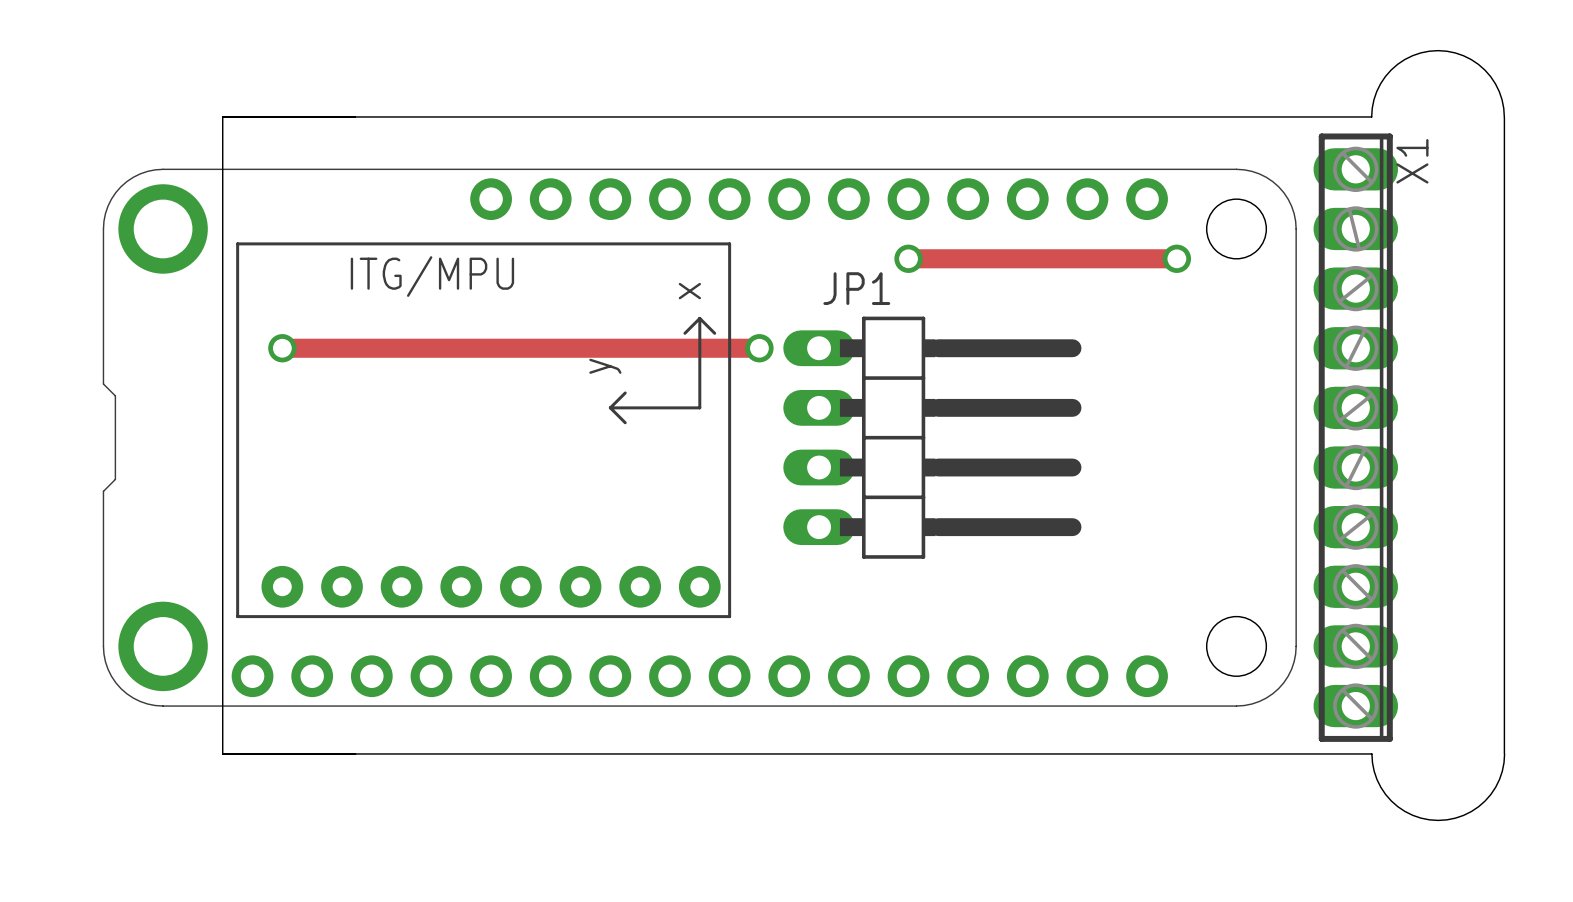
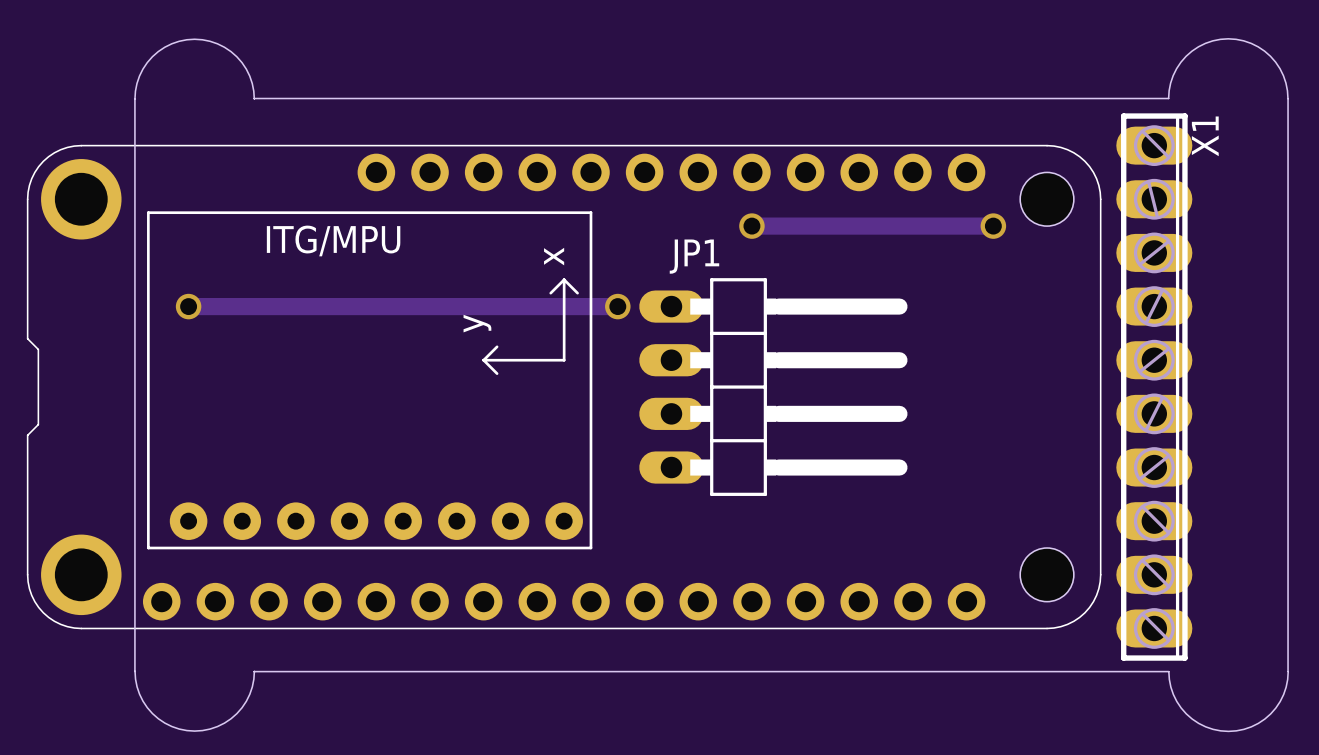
board edge: (222, 116) (355, 116) -> (134, 98) (139, 76) (152, 56) (171, 43) (194, 39) (217, 43) (236, 56) (249, 76) (254, 98)
board edge: (222, 753) (355, 754) -> (135, 671) (139, 694) (152, 713) (171, 726) (194, 731) (217, 726) (236, 713) (249, 694) (254, 671)

